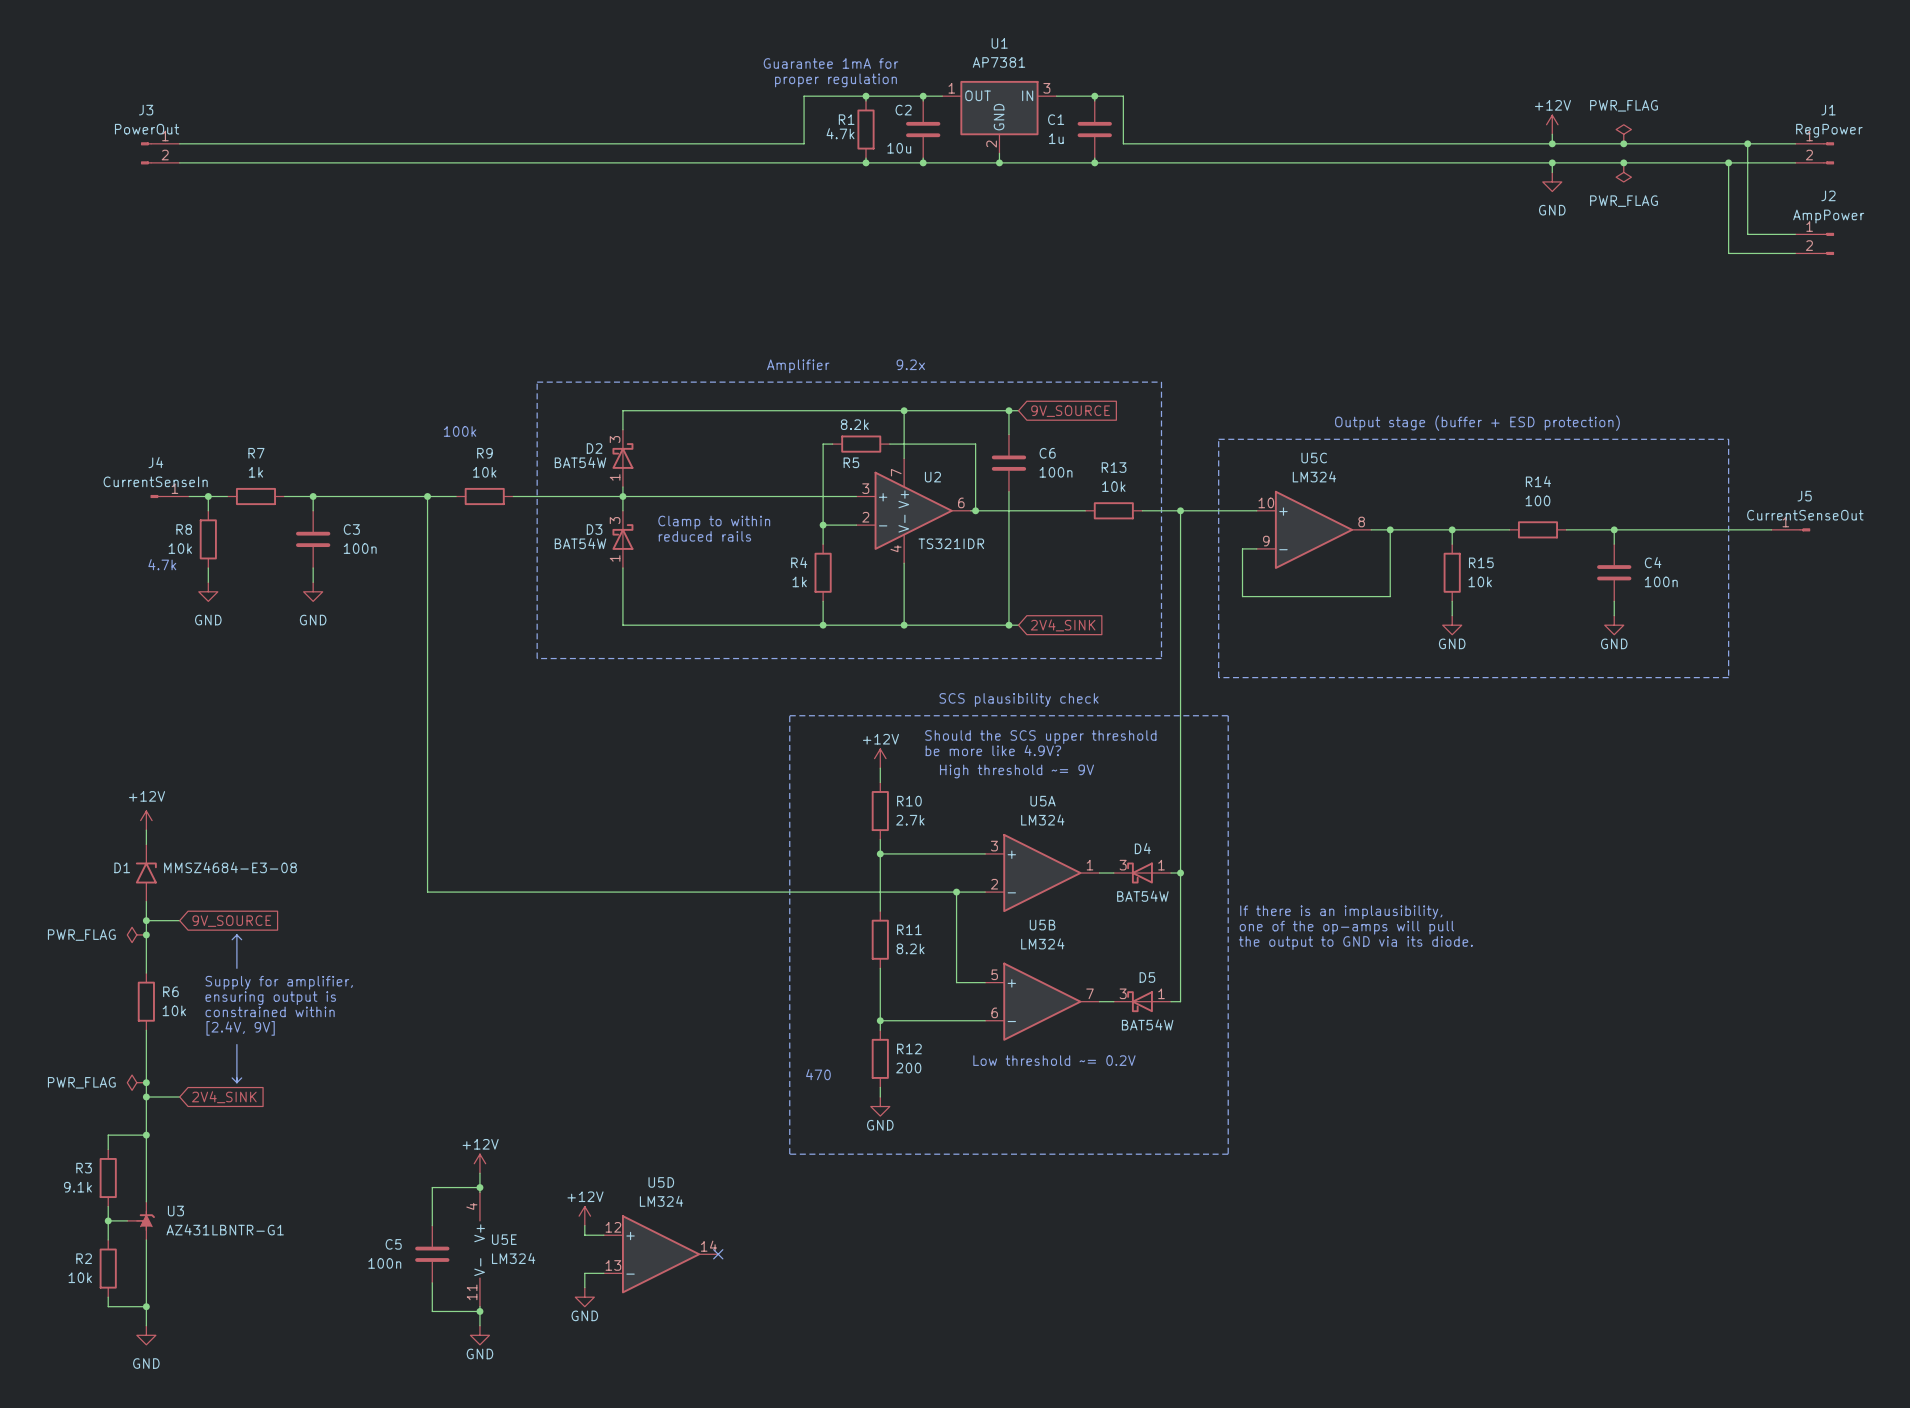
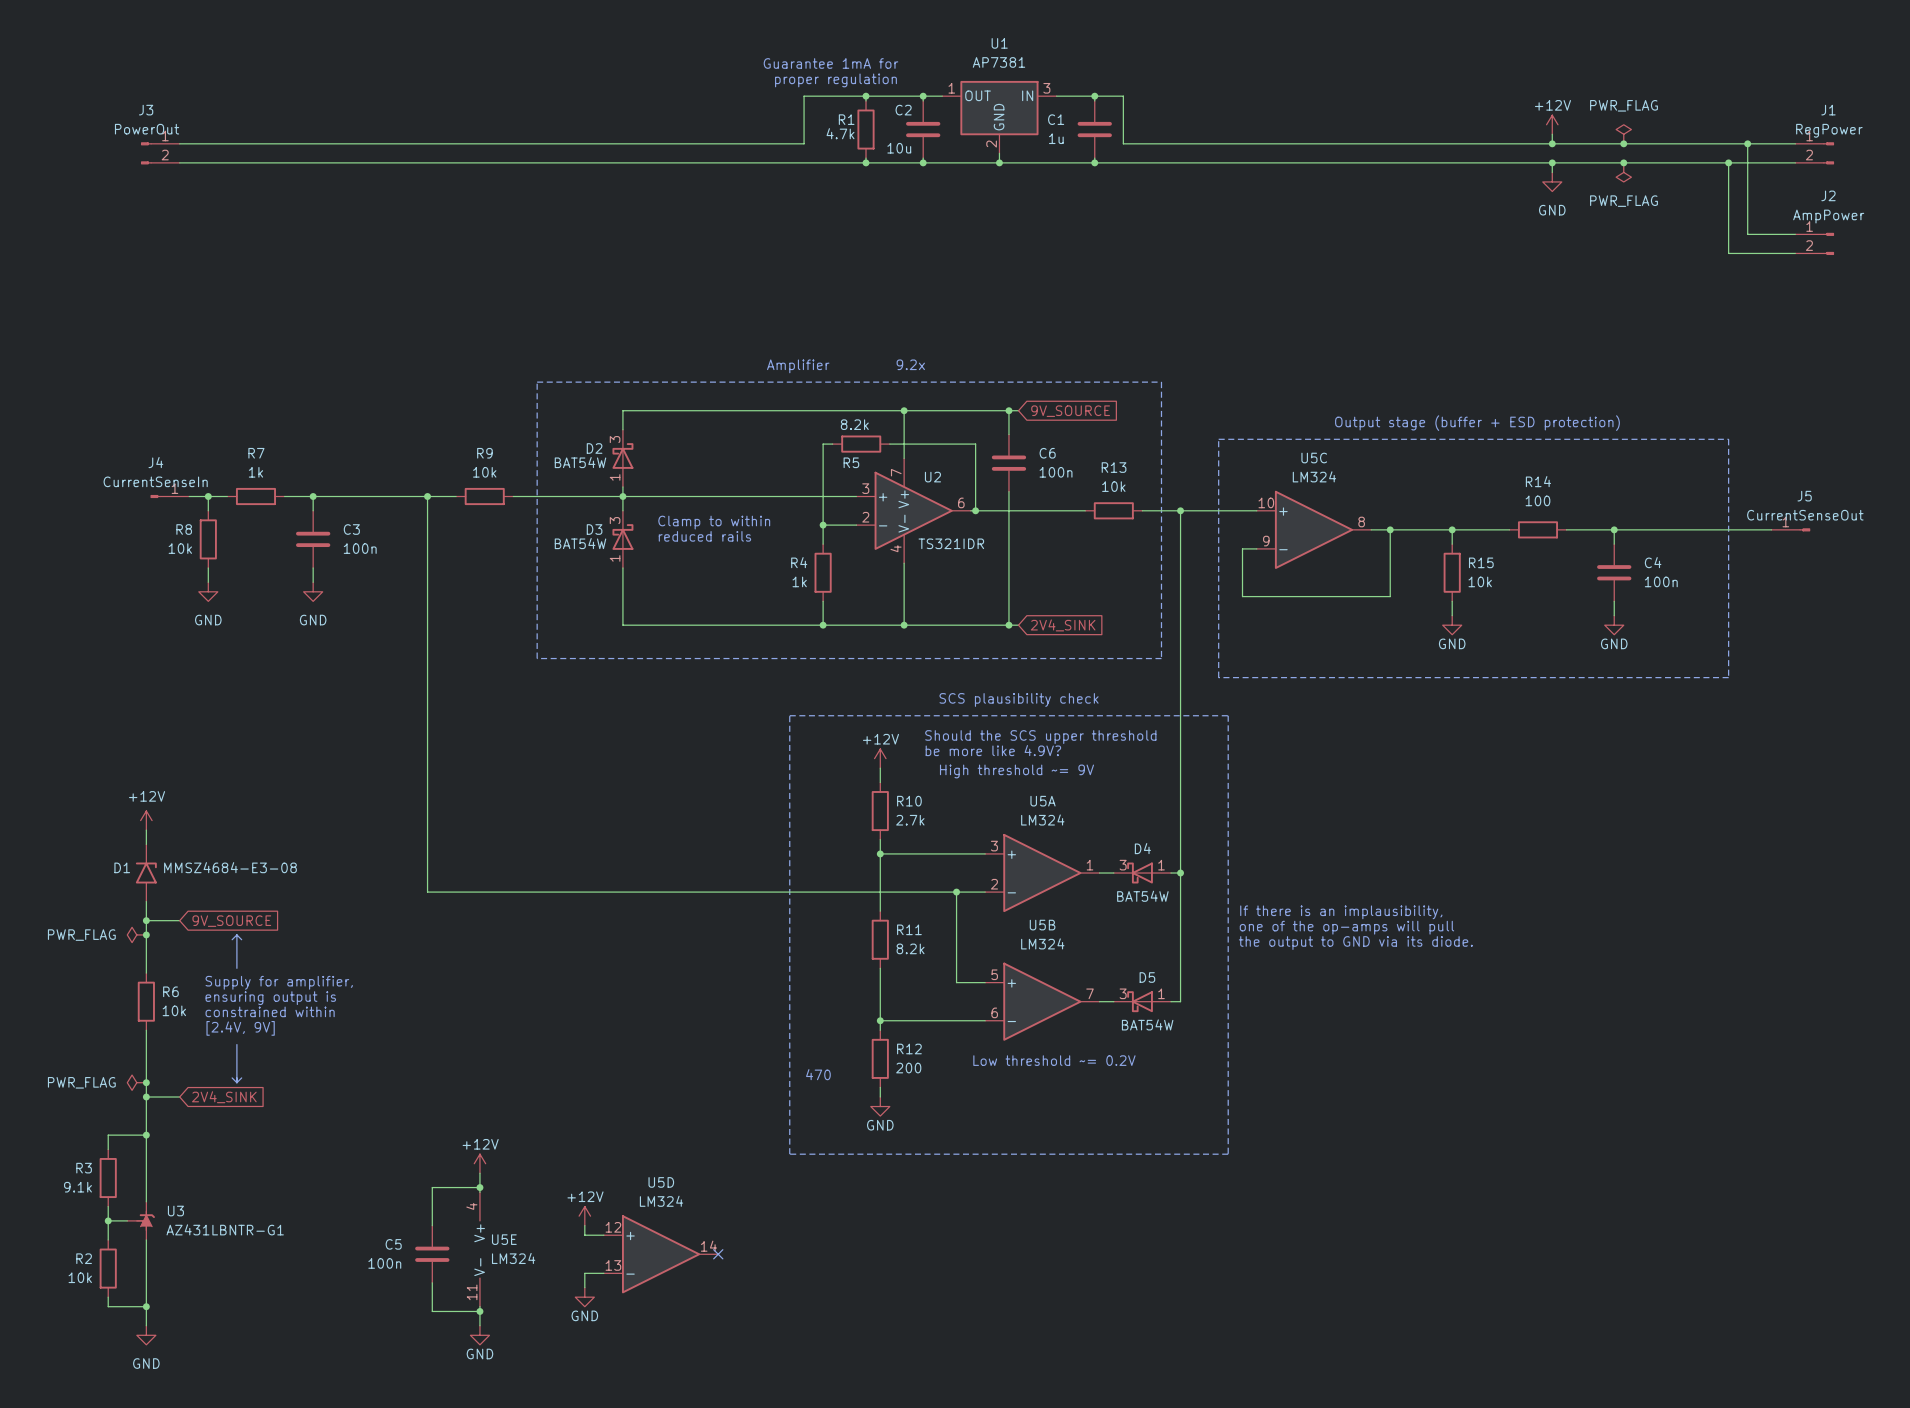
text: 100k (460, 431) -> none
text: 4.7k (162, 564) -> none

